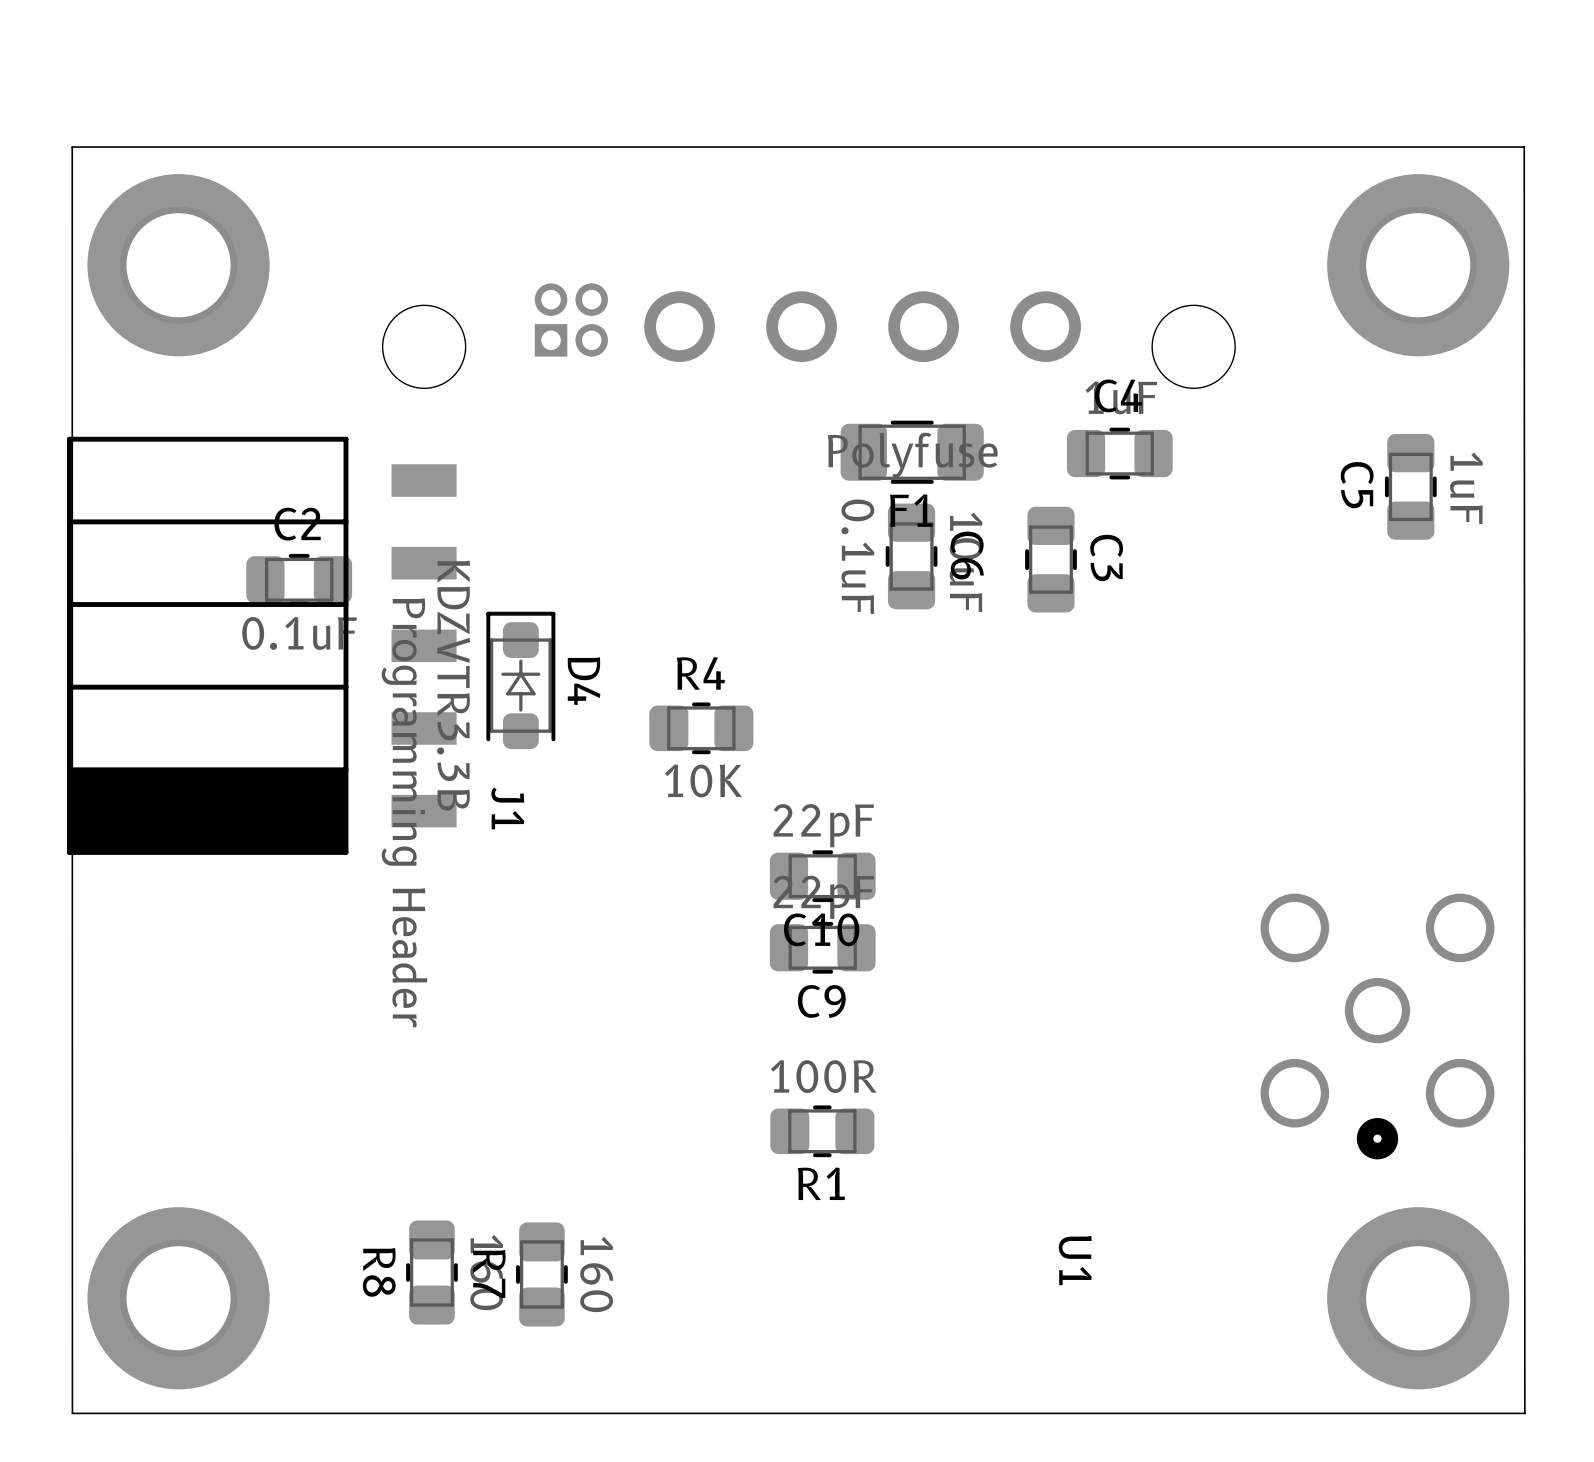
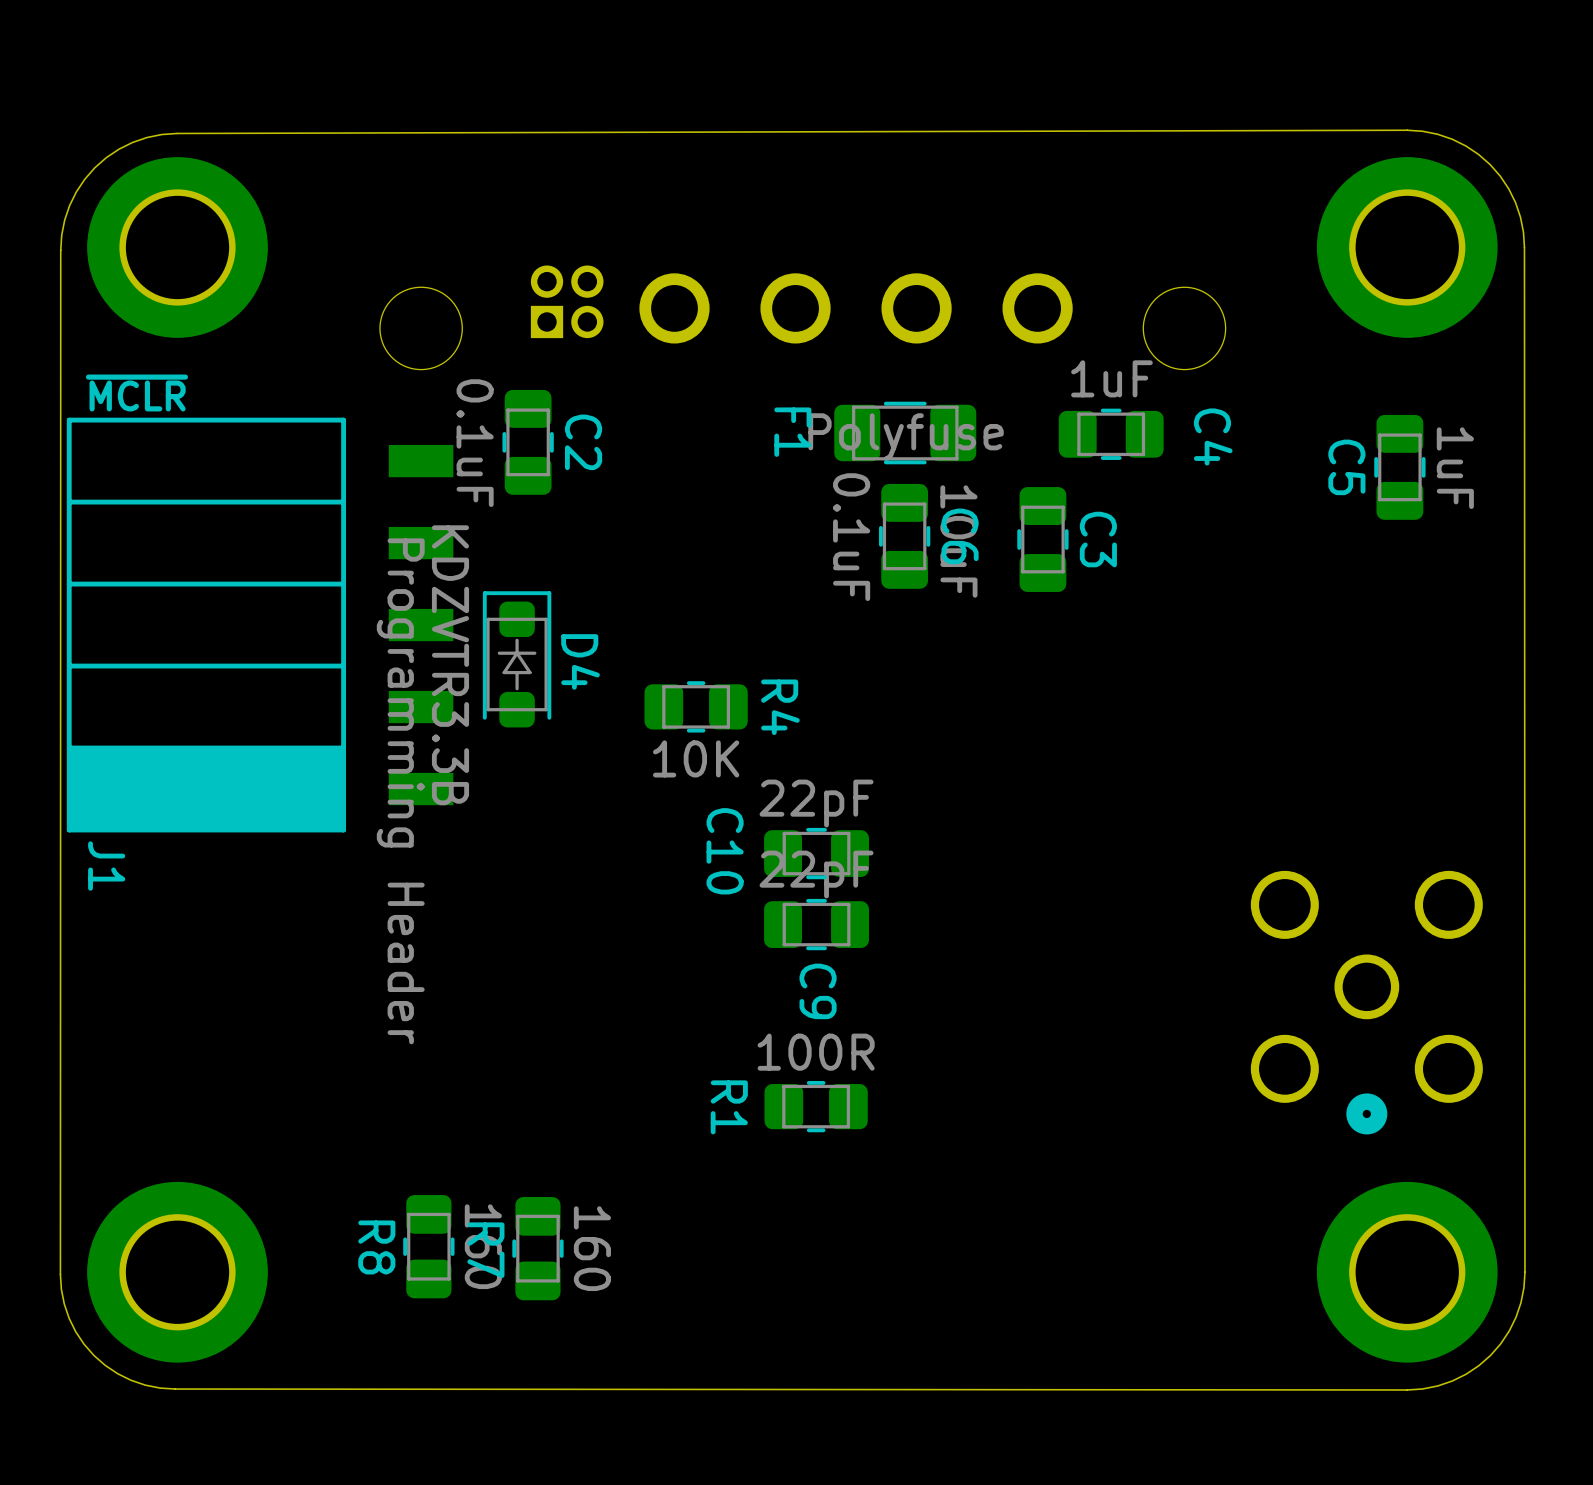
board edge: (1524, 147) (1524, 1413) (72, 1413) (72, 147) (1524, 147) -> (1407, 130) (177, 133) (161, 134) (132, 142) (118, 149) (94, 167) (76, 191) (69, 205) (64, 220) (60, 250) (60, 1274) (61, 1289) (69, 1318) (75, 1331) (93, 1355) (117, 1373) (131, 1380) (159, 1388) (174, 1389) (1407, 1389) (1422, 1388) (1452, 1381) (1466, 1374) (1490, 1355) (1509, 1331) (1515, 1317) (1523, 1287) (1524, 1272) (1523, 232) (1515, 202) (1500, 176) (1490, 164) (1465, 145) (1452, 139) (1437, 134) (1407, 130)
C4 name rotation: 0° (1118, 395) -> 90° clockwise (1213, 437)
C4 name position: C4 (1118, 395) -> C4 (1213, 437)
text: none -> ~{MCLR} (136, 392)
F1 name rotation: 0° (911, 510) -> 90° clockwise (792, 432)
F1 name position: F1 (911, 510) -> F1 (792, 432)
C2 rotation: 0° (299, 579) -> 90° clockwise (528, 442)
C2 position: (299, 579) -> (528, 442)
R4 name rotation: 0° (700, 673) -> 90° clockwise (780, 707)
R4 name position: R4 (700, 673) -> R4 (780, 707)
J1 name position: J1 (507, 808) -> J1 (106, 866)
C10 name rotation: 0° (821, 929) -> 90° clockwise (725, 851)
C9 name rotation: 0° (821, 1001) -> 90° clockwise (818, 991)
R1 name rotation: 0° (821, 1183) -> 90° clockwise (729, 1107)
R1 name position: R1 (821, 1183) -> R1 (729, 1107)
U1: (1075, 1260) -> none

